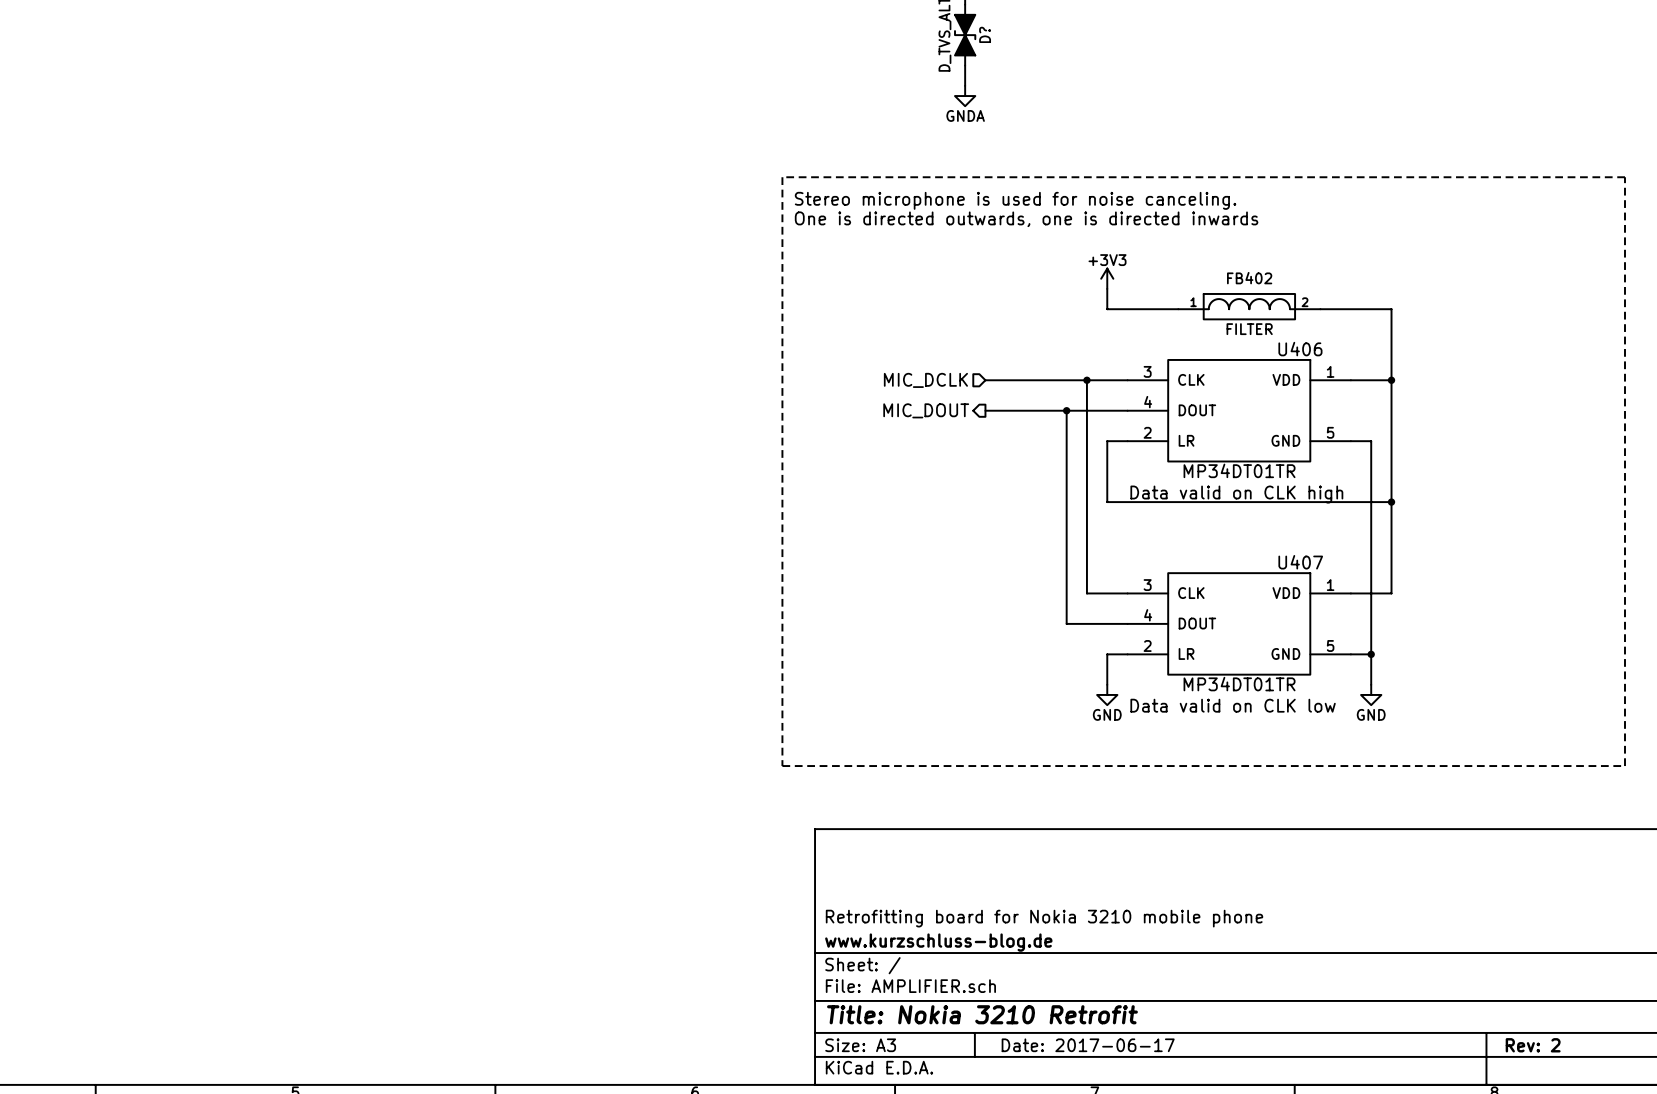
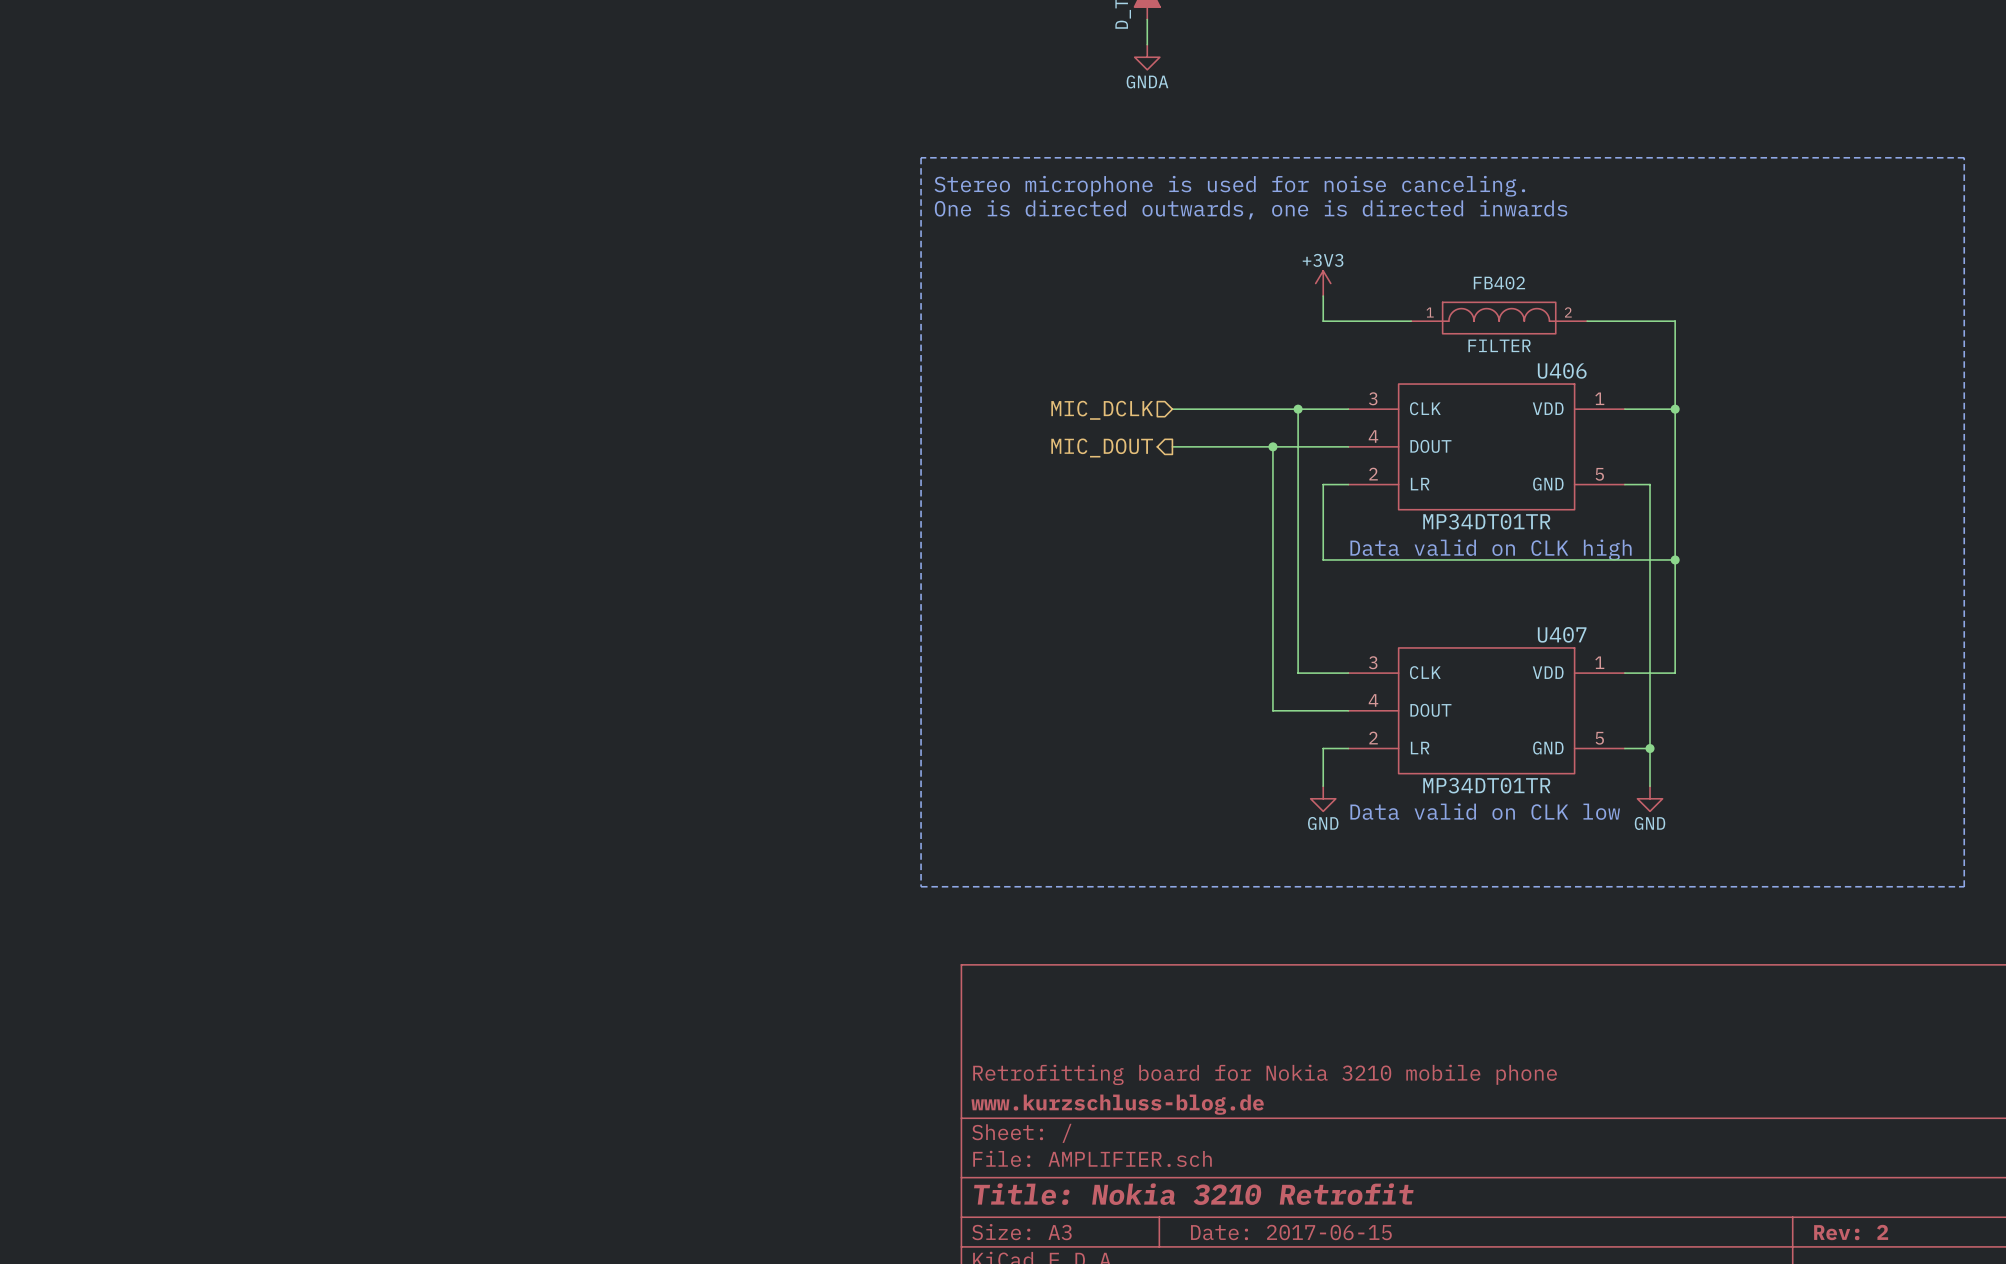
title block: Date: 2017-06-17 (1088, 1045) -> Date: 2017-06-15 (1291, 1232)

